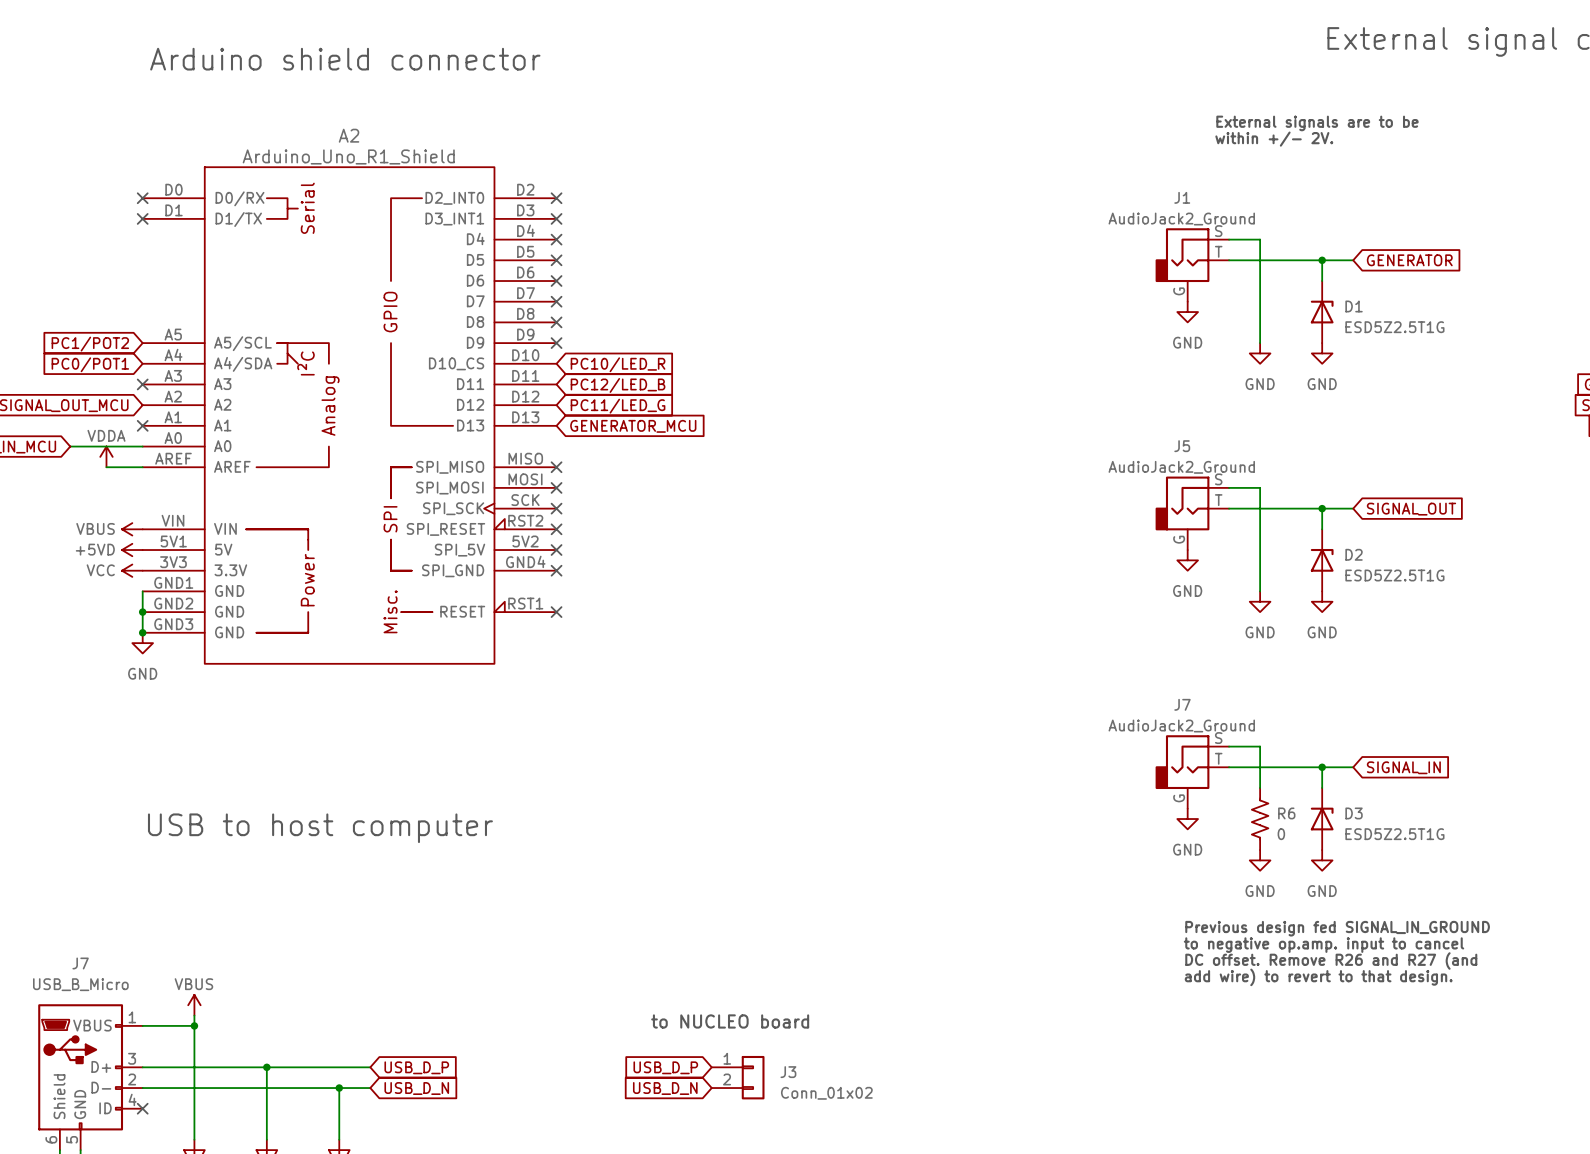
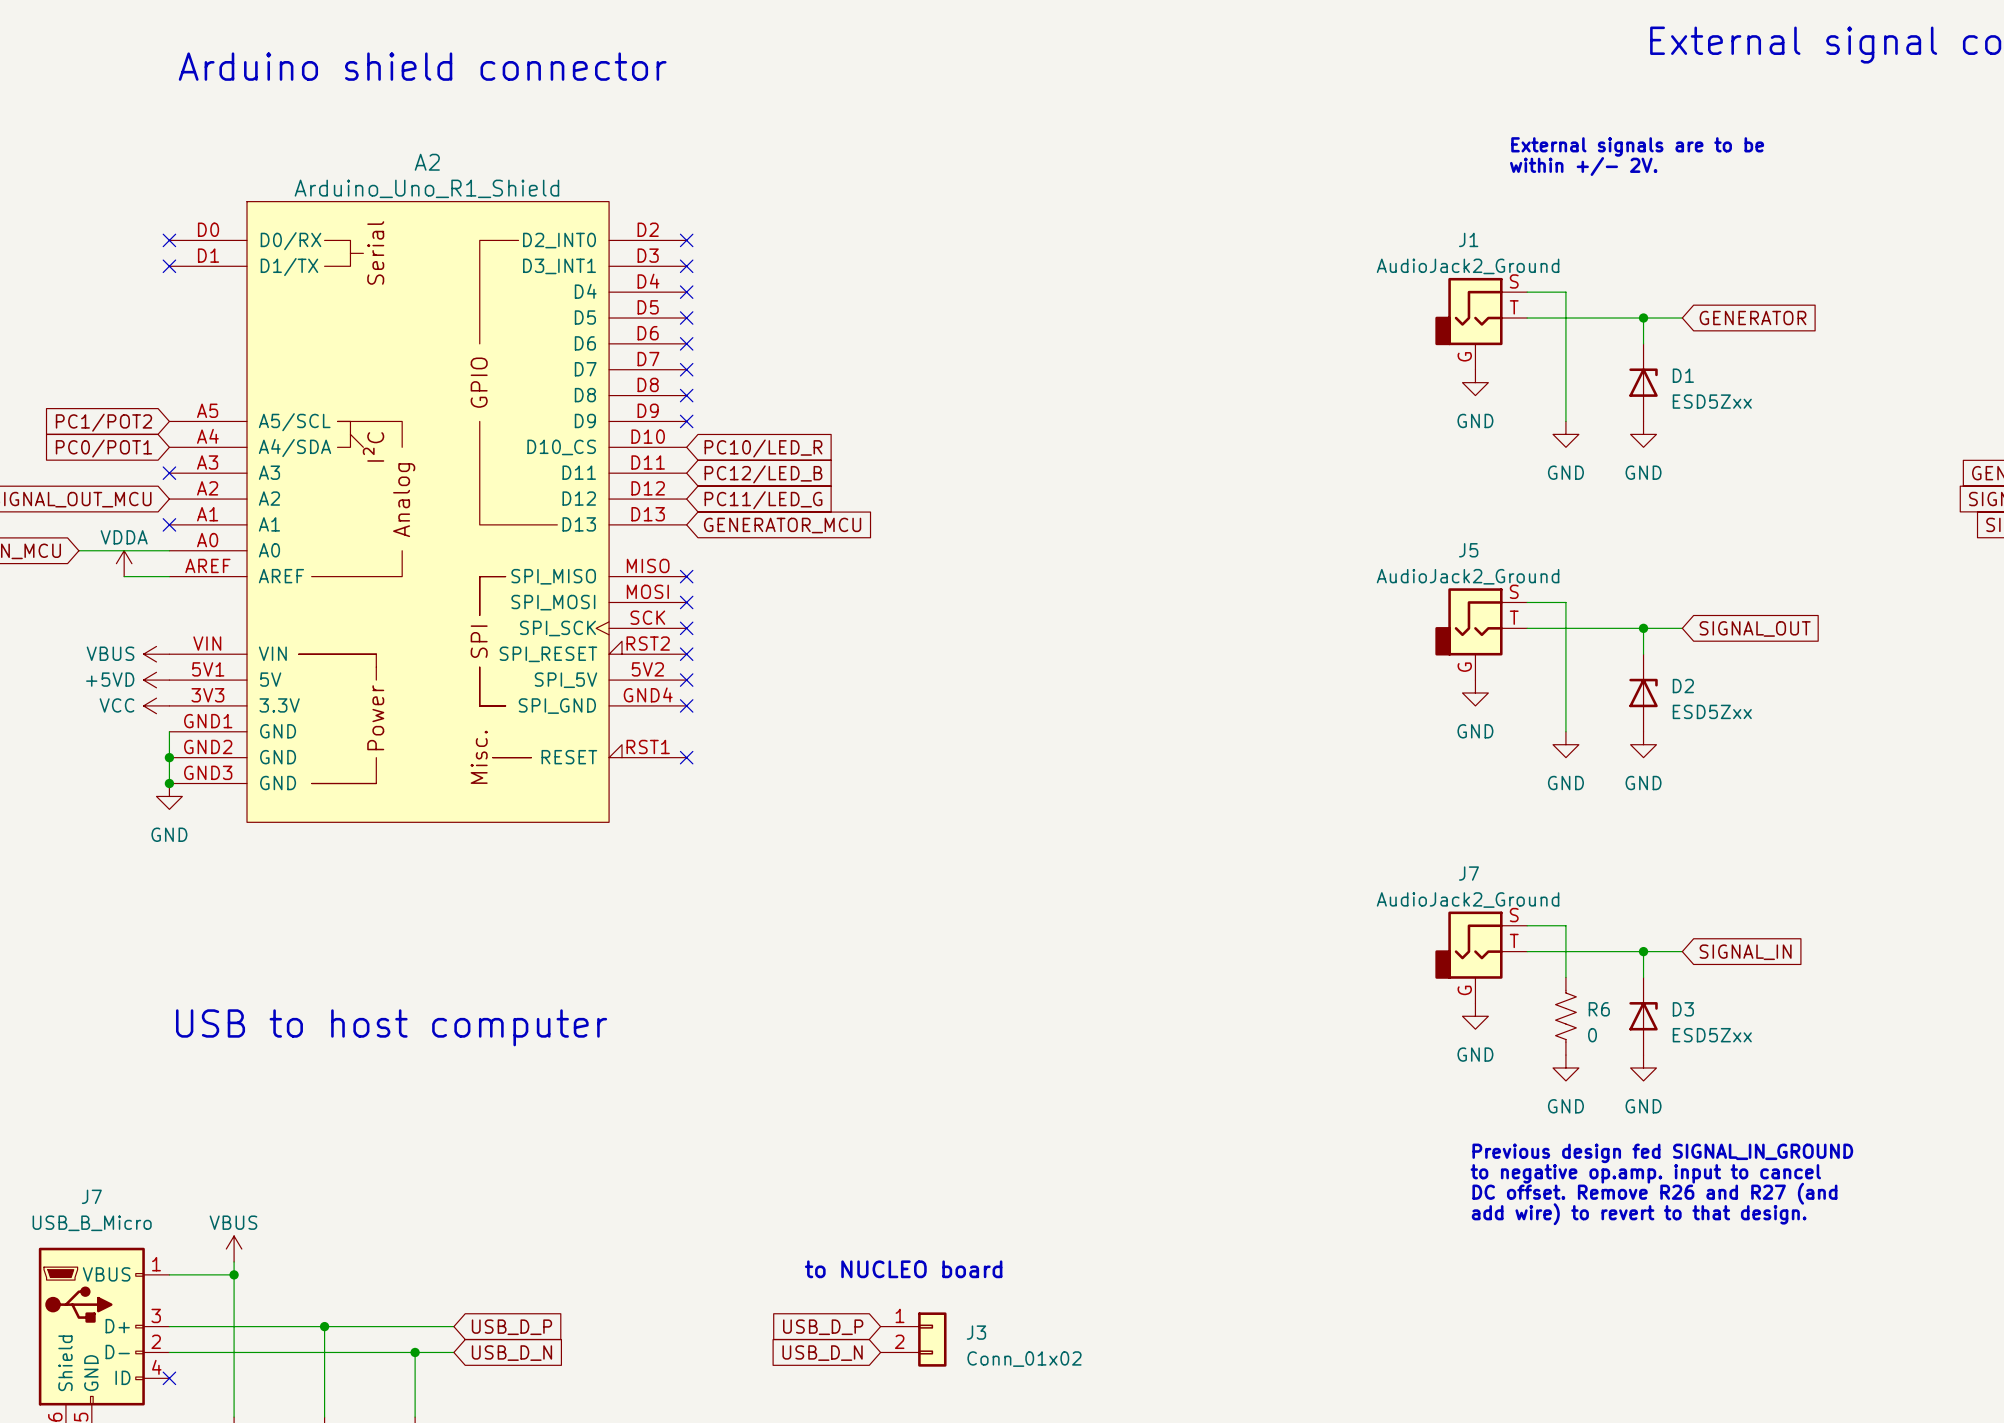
D1 value: ESD5Z2.5T1G (1394, 327) -> ESD5Zxx (1712, 401)
D2 value: ESD5Z2.5T1G (1394, 575) -> ESD5Zxx (1712, 711)
D3 value: ESD5Z2.5T1G (1394, 834) -> ESD5Zxx (1712, 1035)

